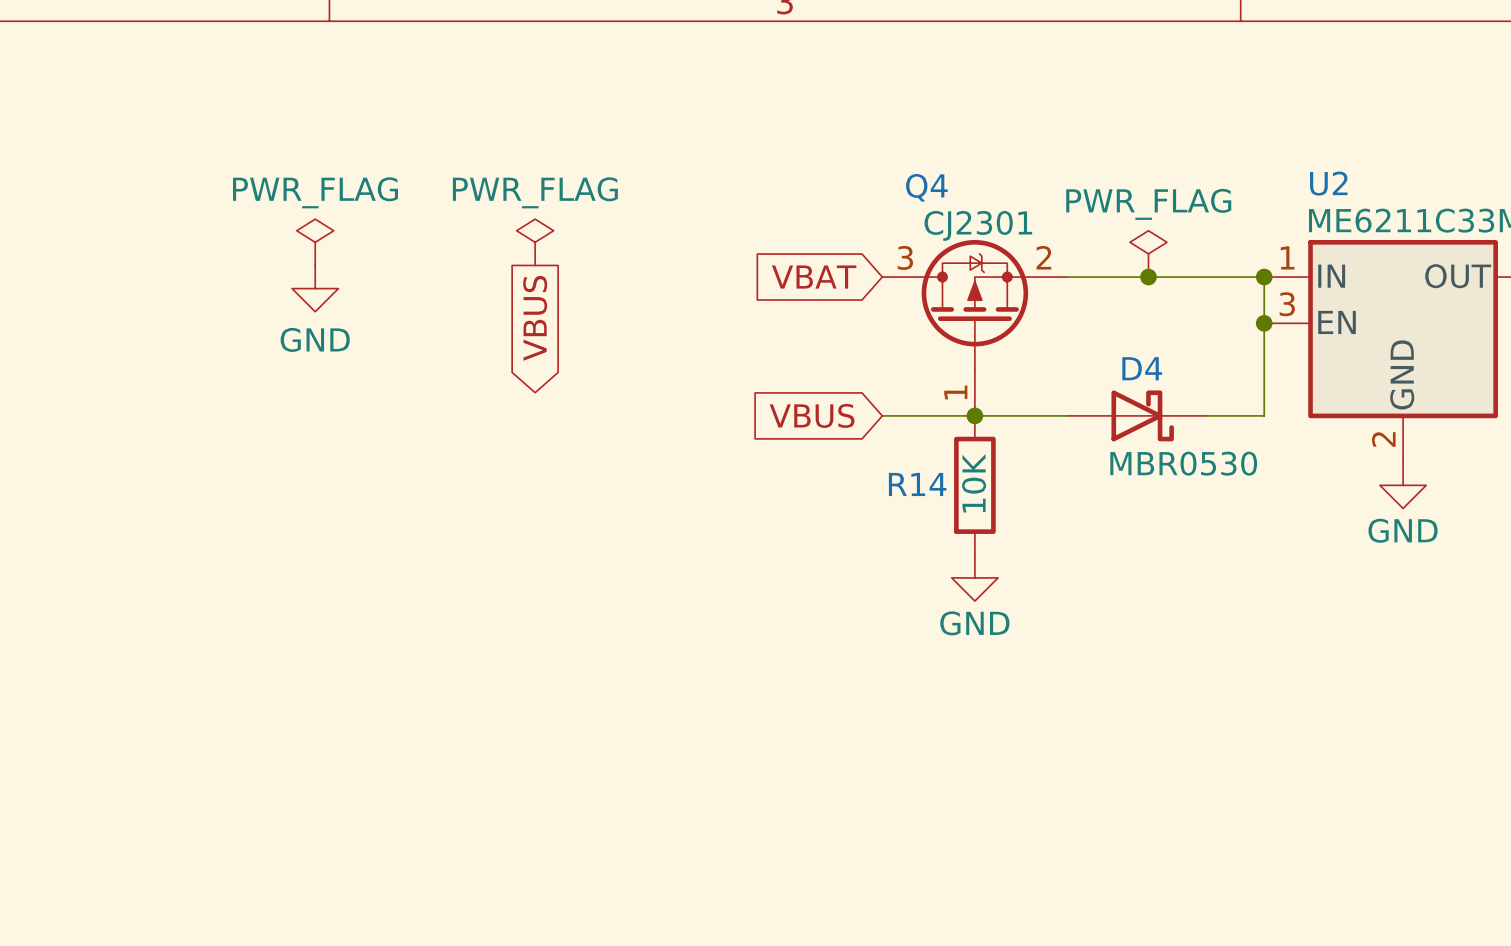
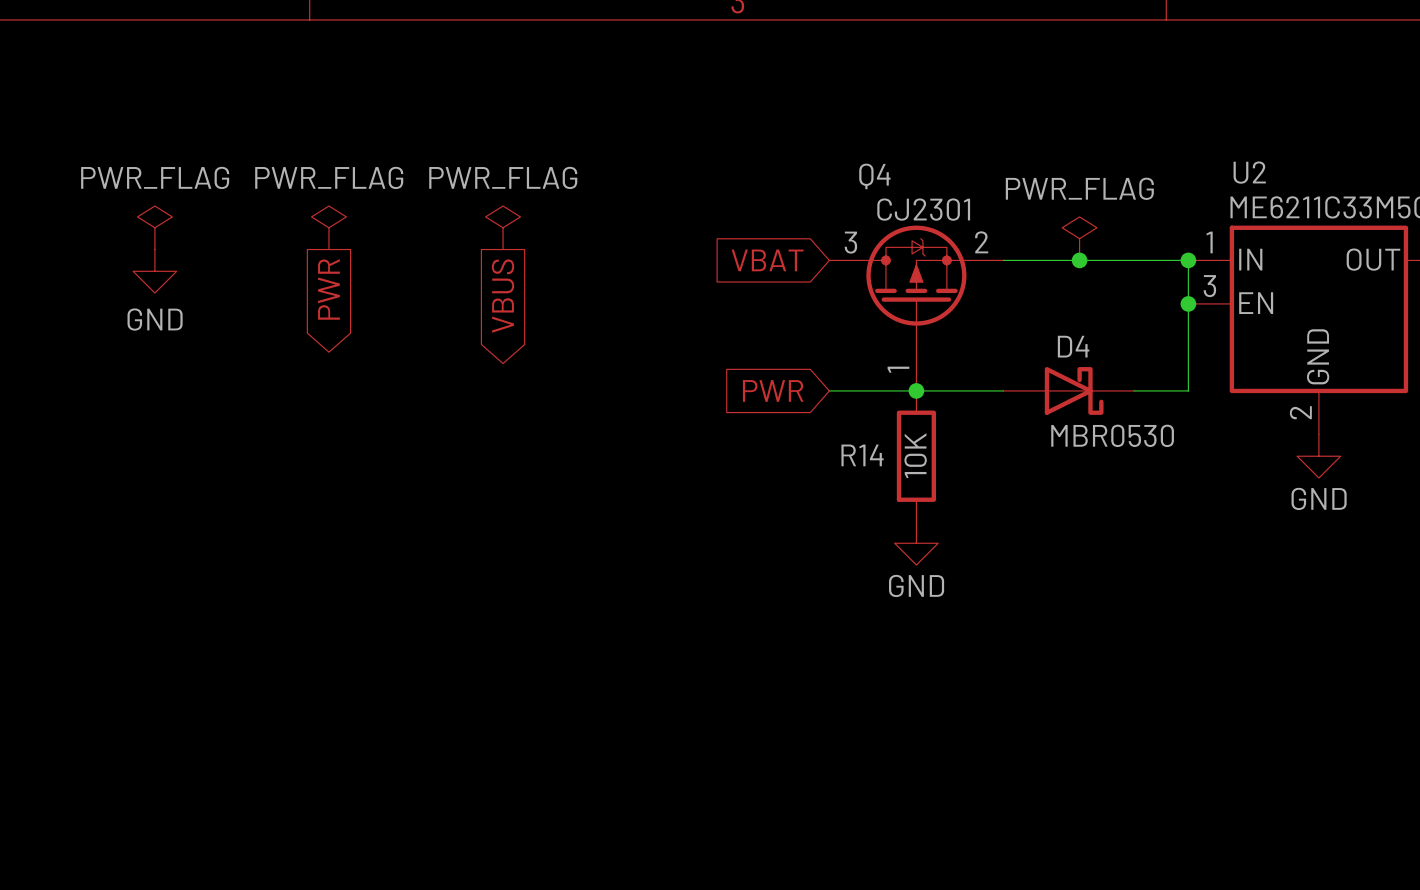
power symbol: none -> PWR_FLAG (154, 227)
power symbol position: PWR_FLAG (315, 242) -> PWR_FLAG (328, 227)
power symbol position: GND (315, 288) -> GND (154, 271)
global label: none -> PWR (328, 289)
global label: VBUS (812, 415) -> PWR (773, 390)

